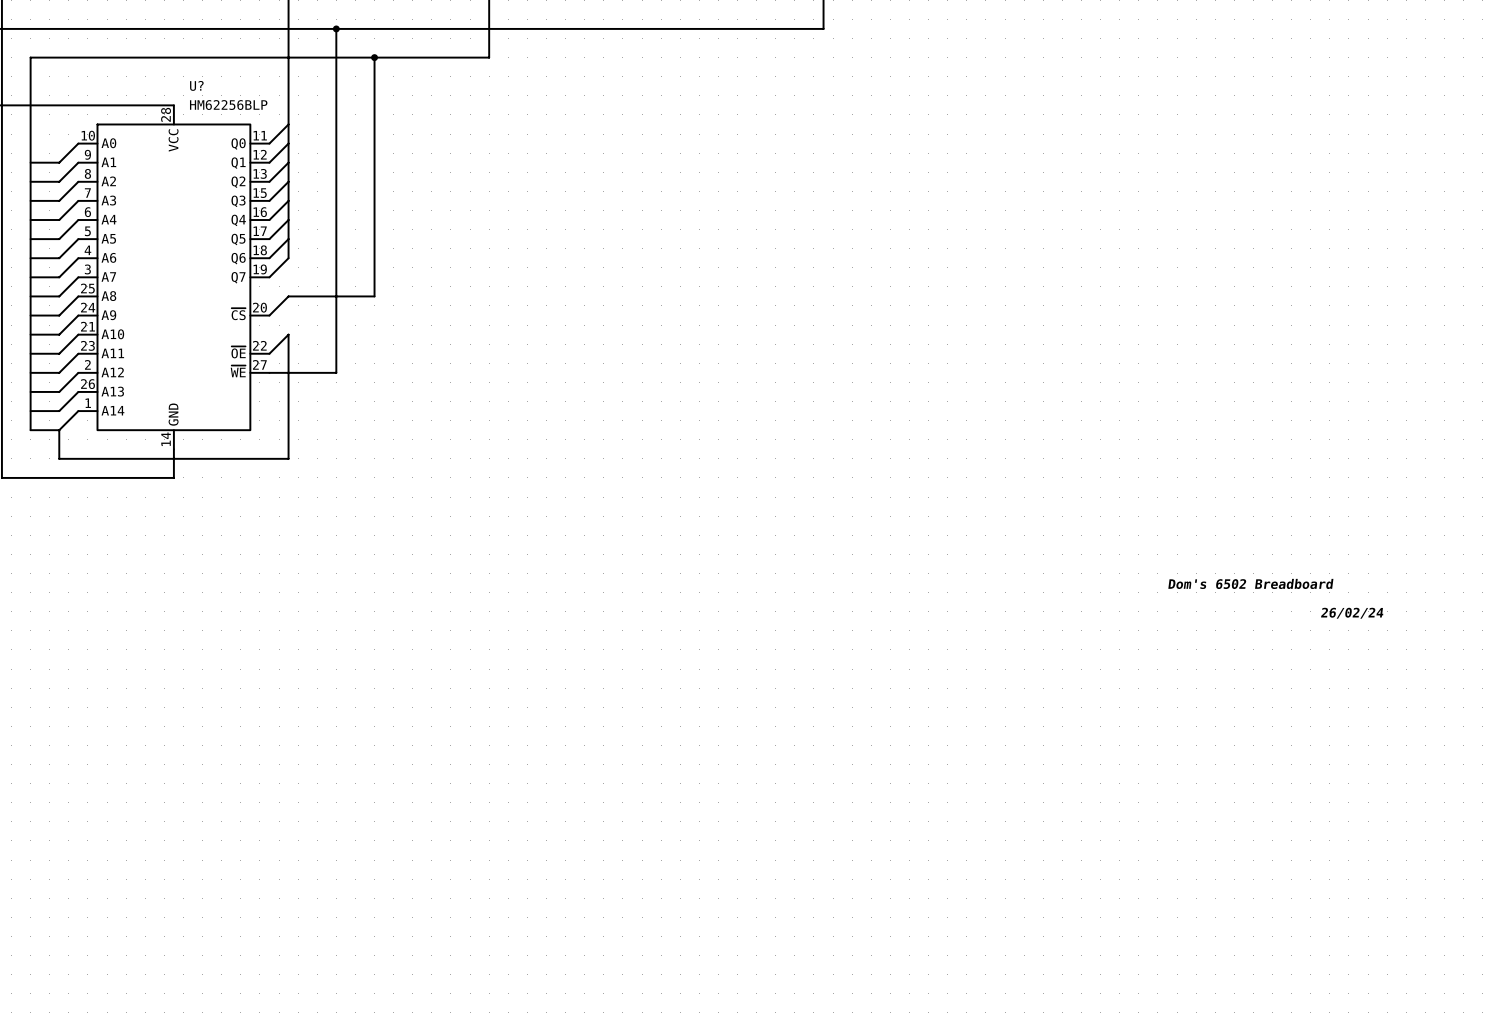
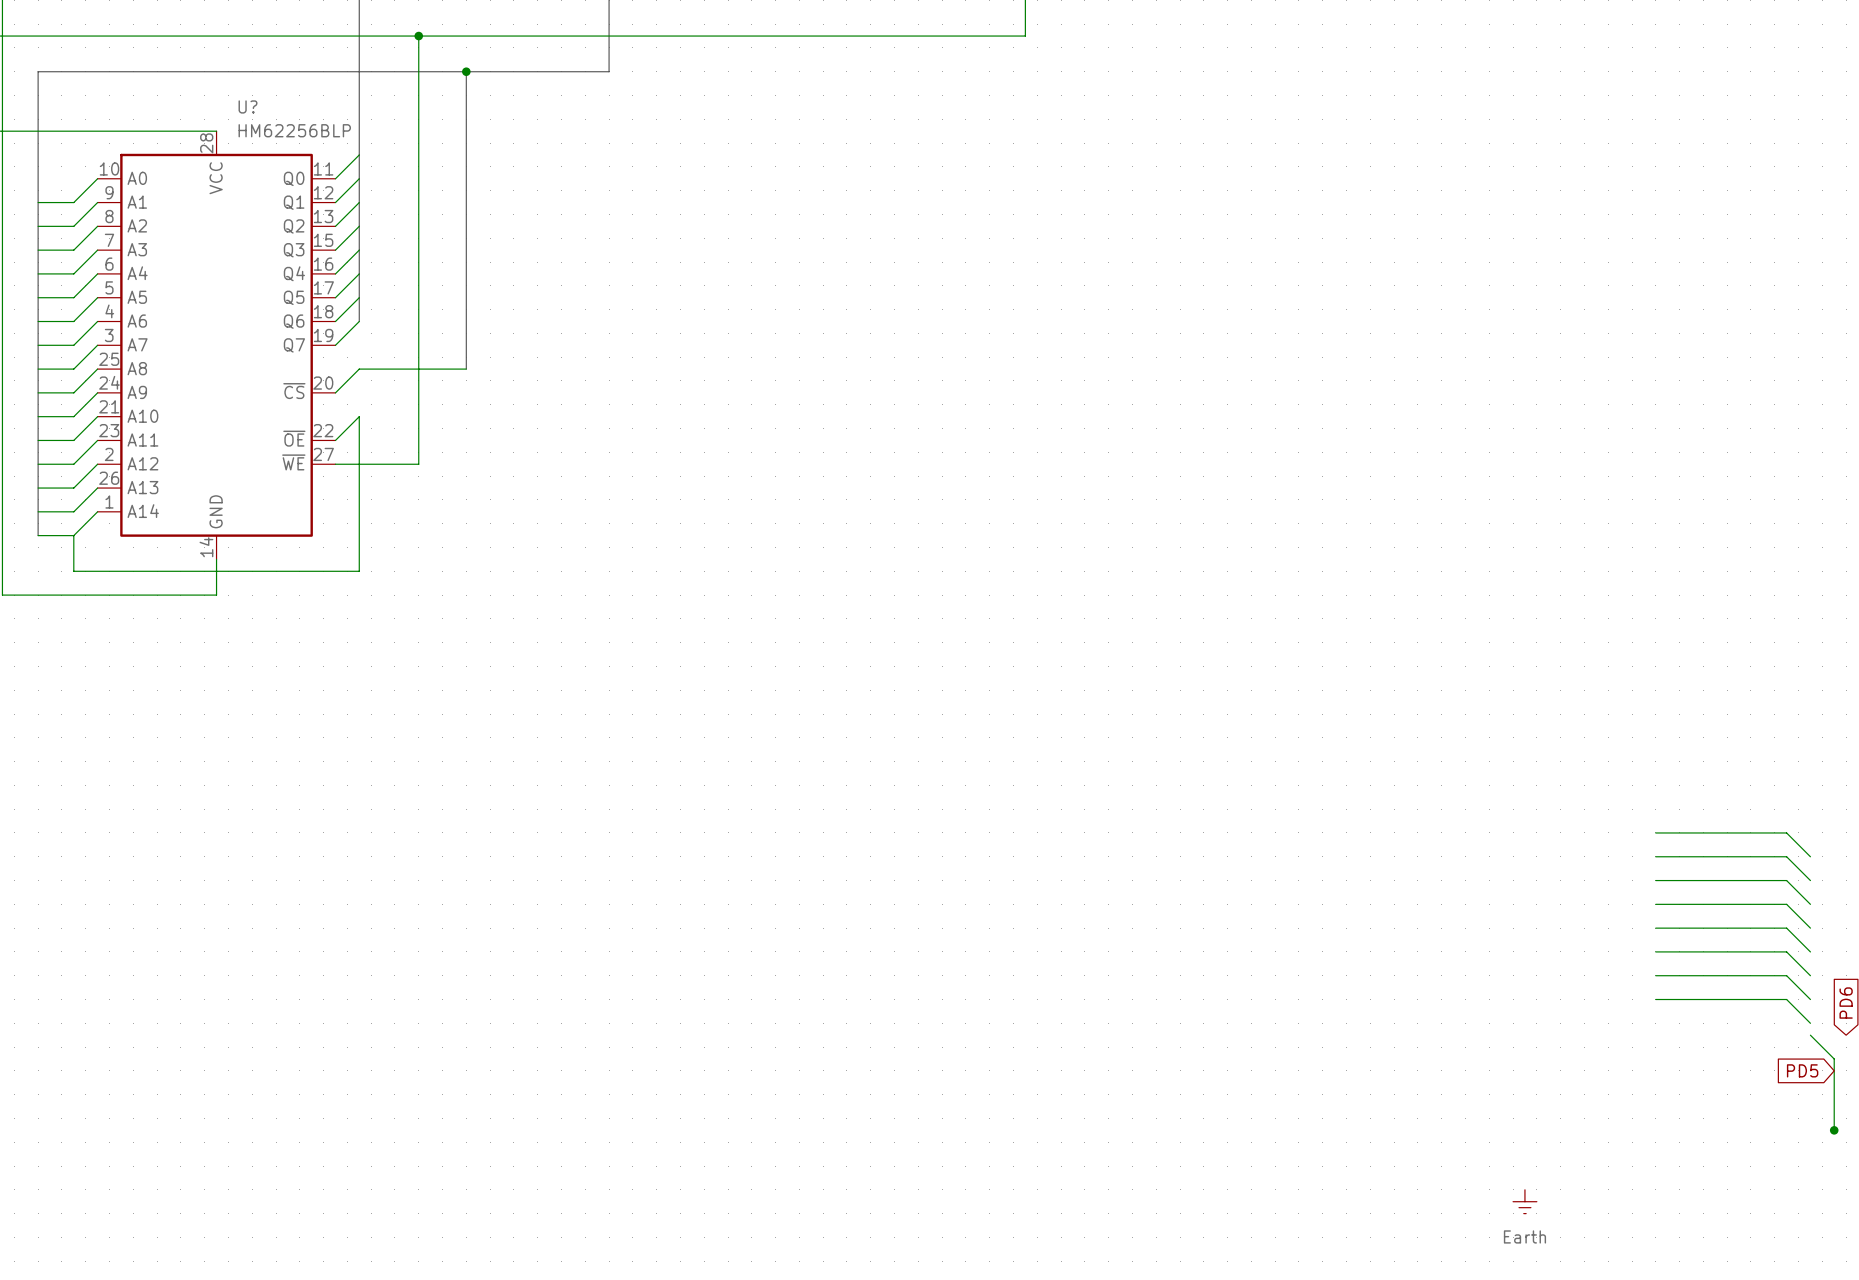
label: Dom's 6502 Breadboard (1250, 583) -> none
label: 26/02/24 (1352, 613) -> none
wire: none -> (1655, 832) (1786, 832) (1810, 856)
wire: none -> (1655, 856) (1786, 856) (1810, 880)
wire: none -> (1655, 880) (1786, 880) (1810, 904)
wire: none -> (1655, 904) (1786, 904) (1810, 928)
wire: none -> (1655, 928) (1786, 928) (1810, 951)
wire: none -> (1655, 951) (1786, 951) (1810, 975)
wire: none -> (1655, 975) (1786, 975) (1810, 999)
wire: none -> (1655, 999) (1786, 999) (1810, 1023)
global label: none -> PD6 (1846, 1003)
wire: none -> (1810, 1035) (1834, 1058) (1834, 1130)
global label: none -> PD5 (1802, 1070)
junction: none -> (1834, 1130)
power symbol: none -> Earth (1524, 1201)

